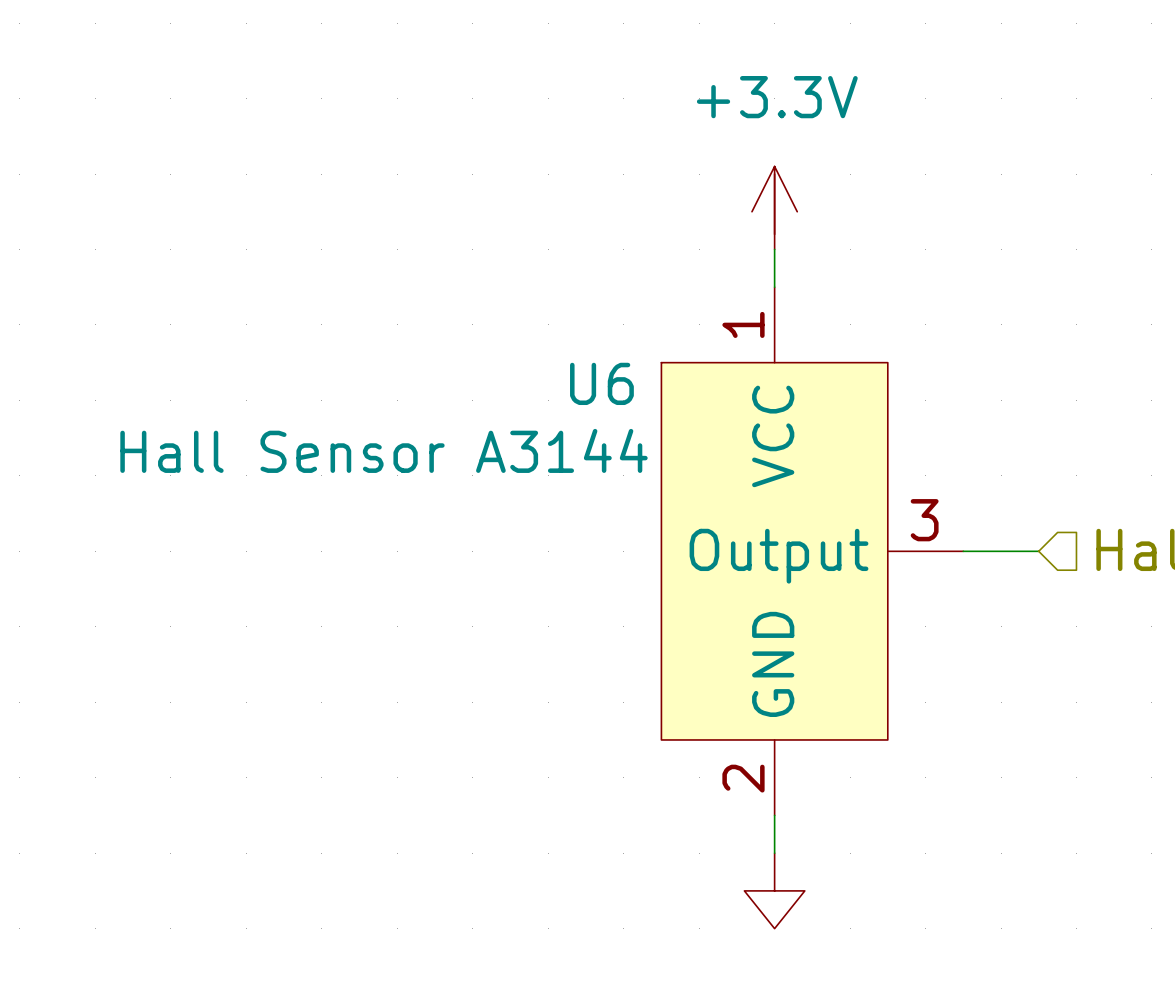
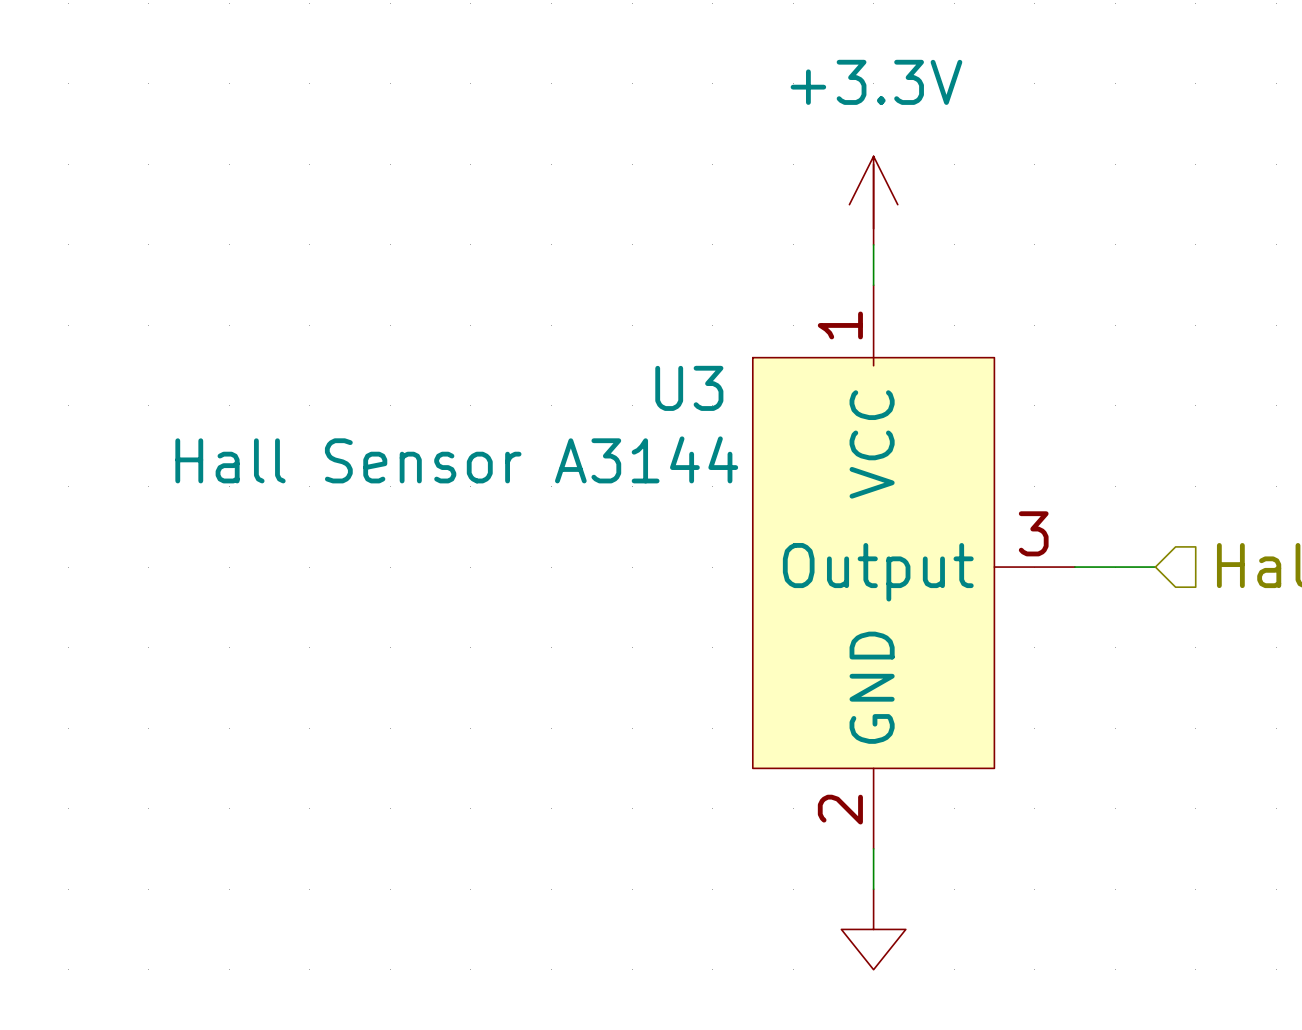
U6: Hall Sensor A3144 (812, 551) -> none
U3: none -> Hall Sensor A3144 (913, 567)

